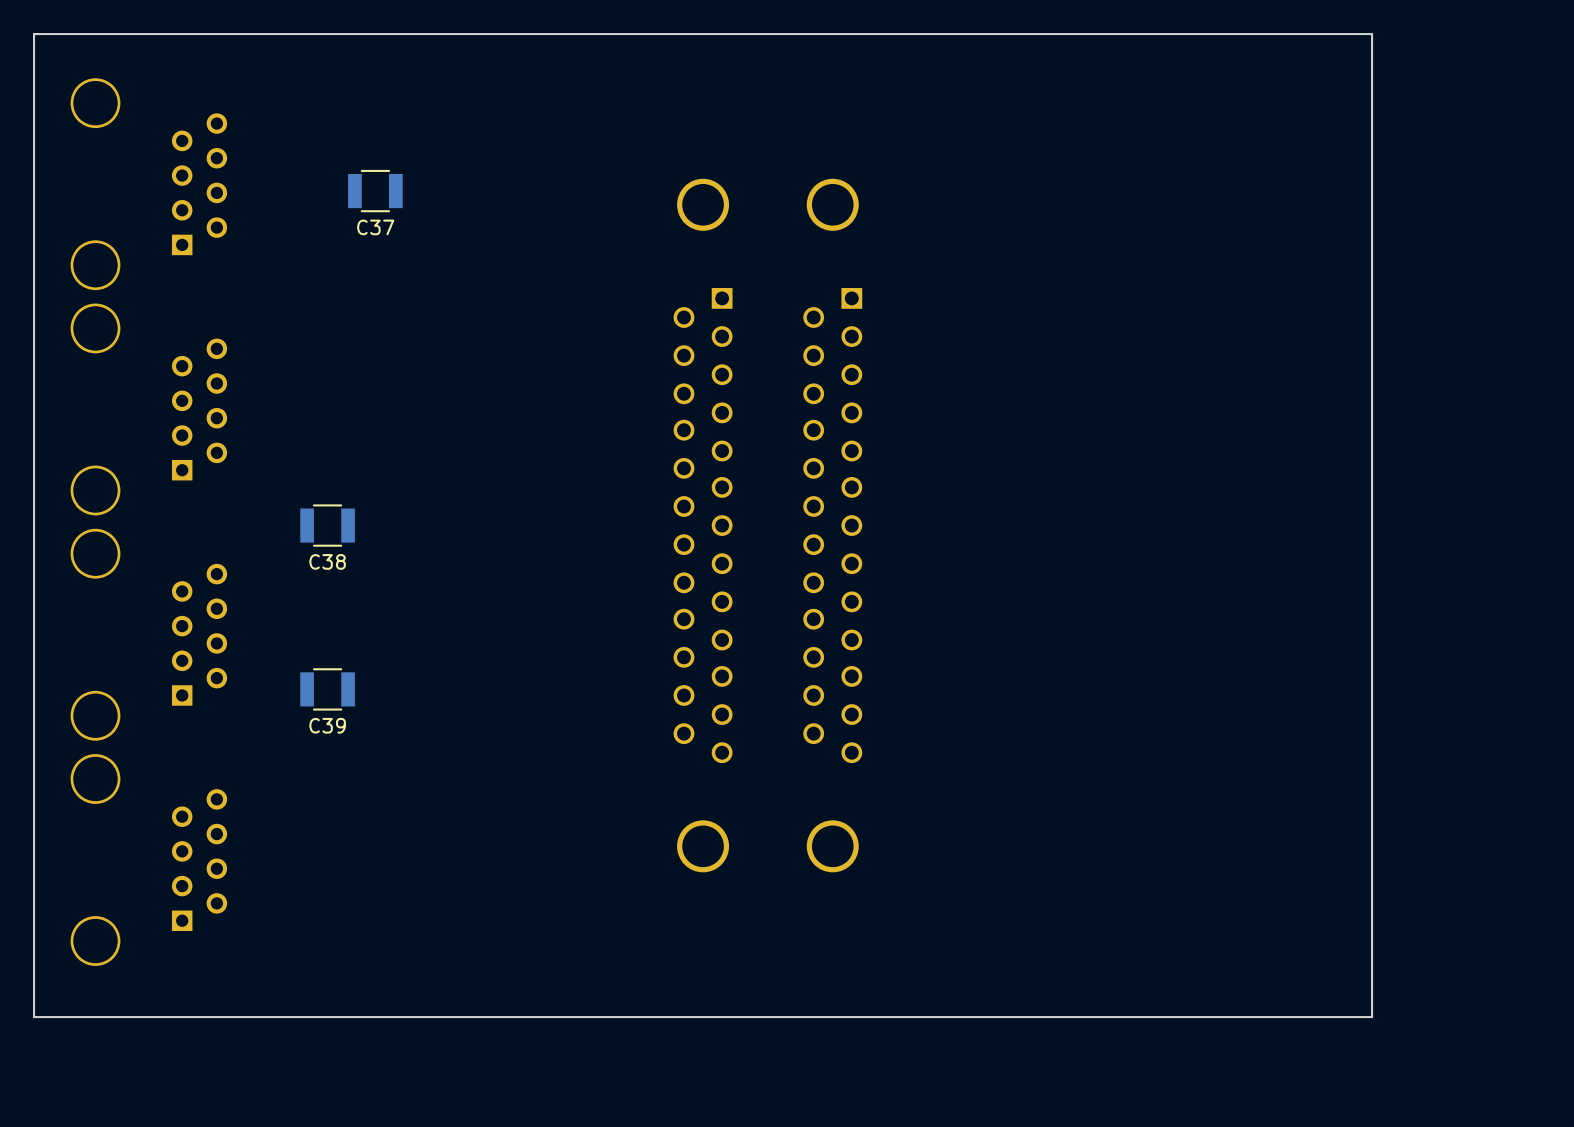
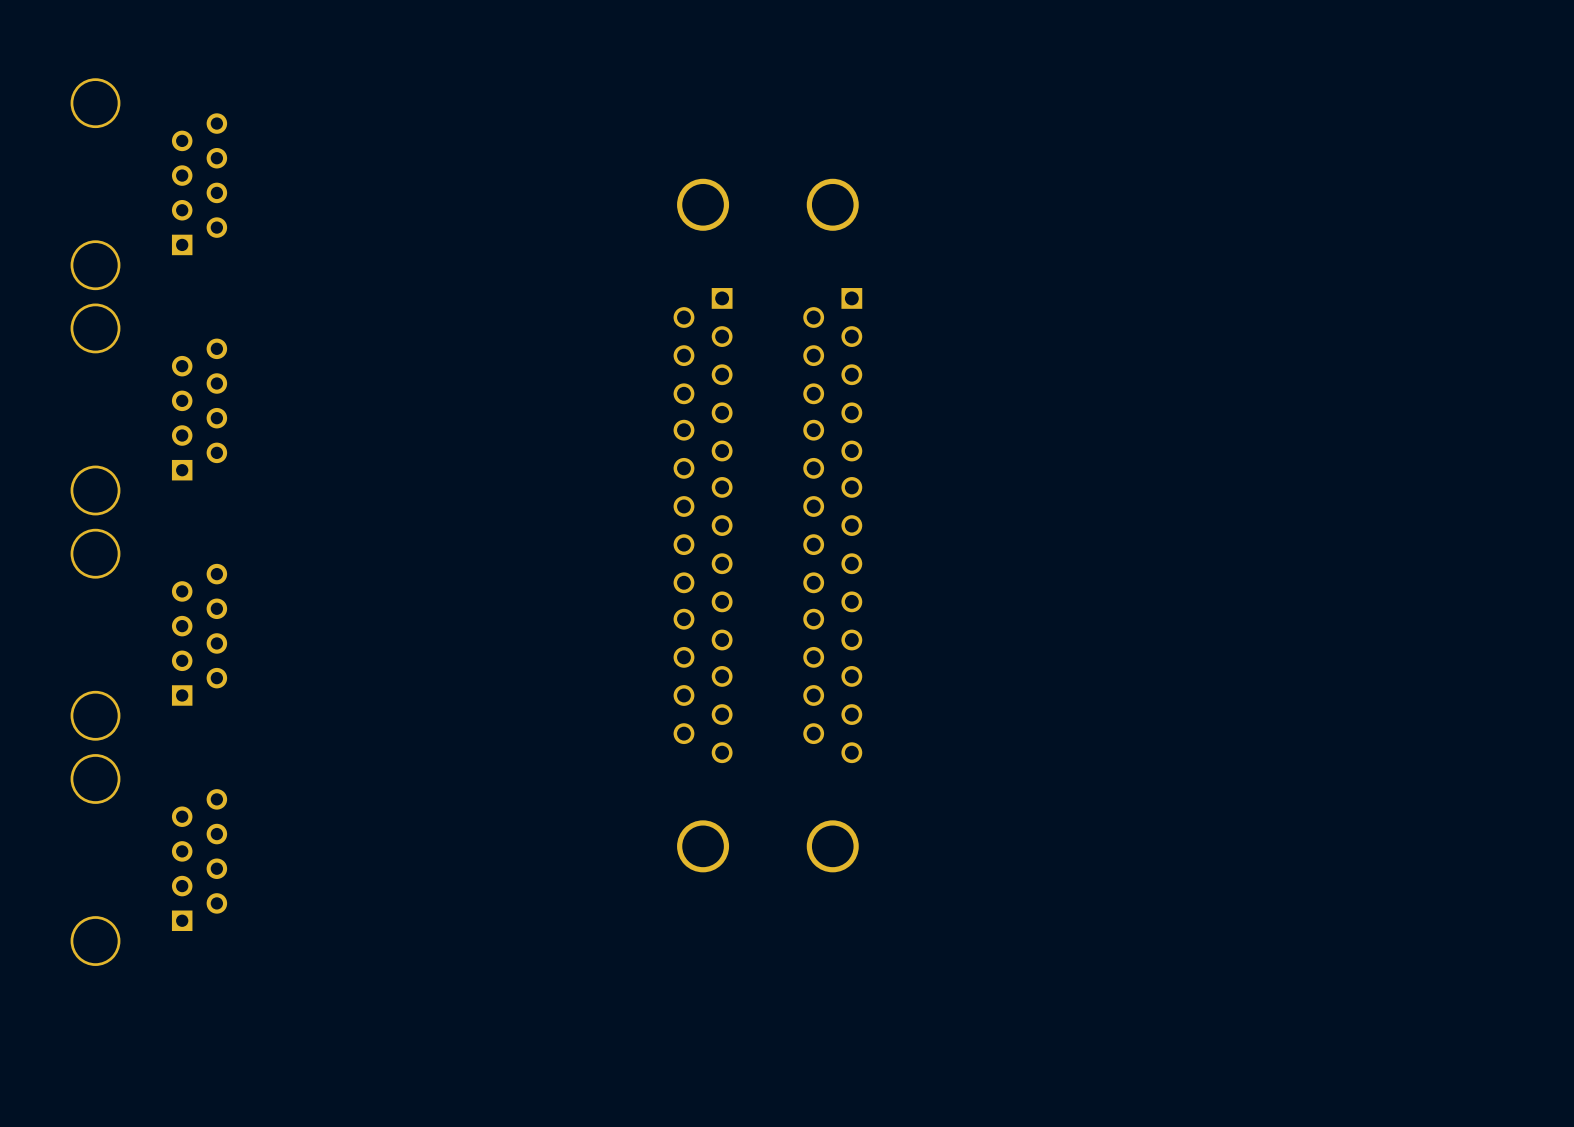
board edge: (1372, 34) (1372, 1017) (34, 1017) (34, 34) (1372, 34) -> none
C37: (375, 191) -> none
C38: (327, 525) -> none
C39: (327, 689) -> none

